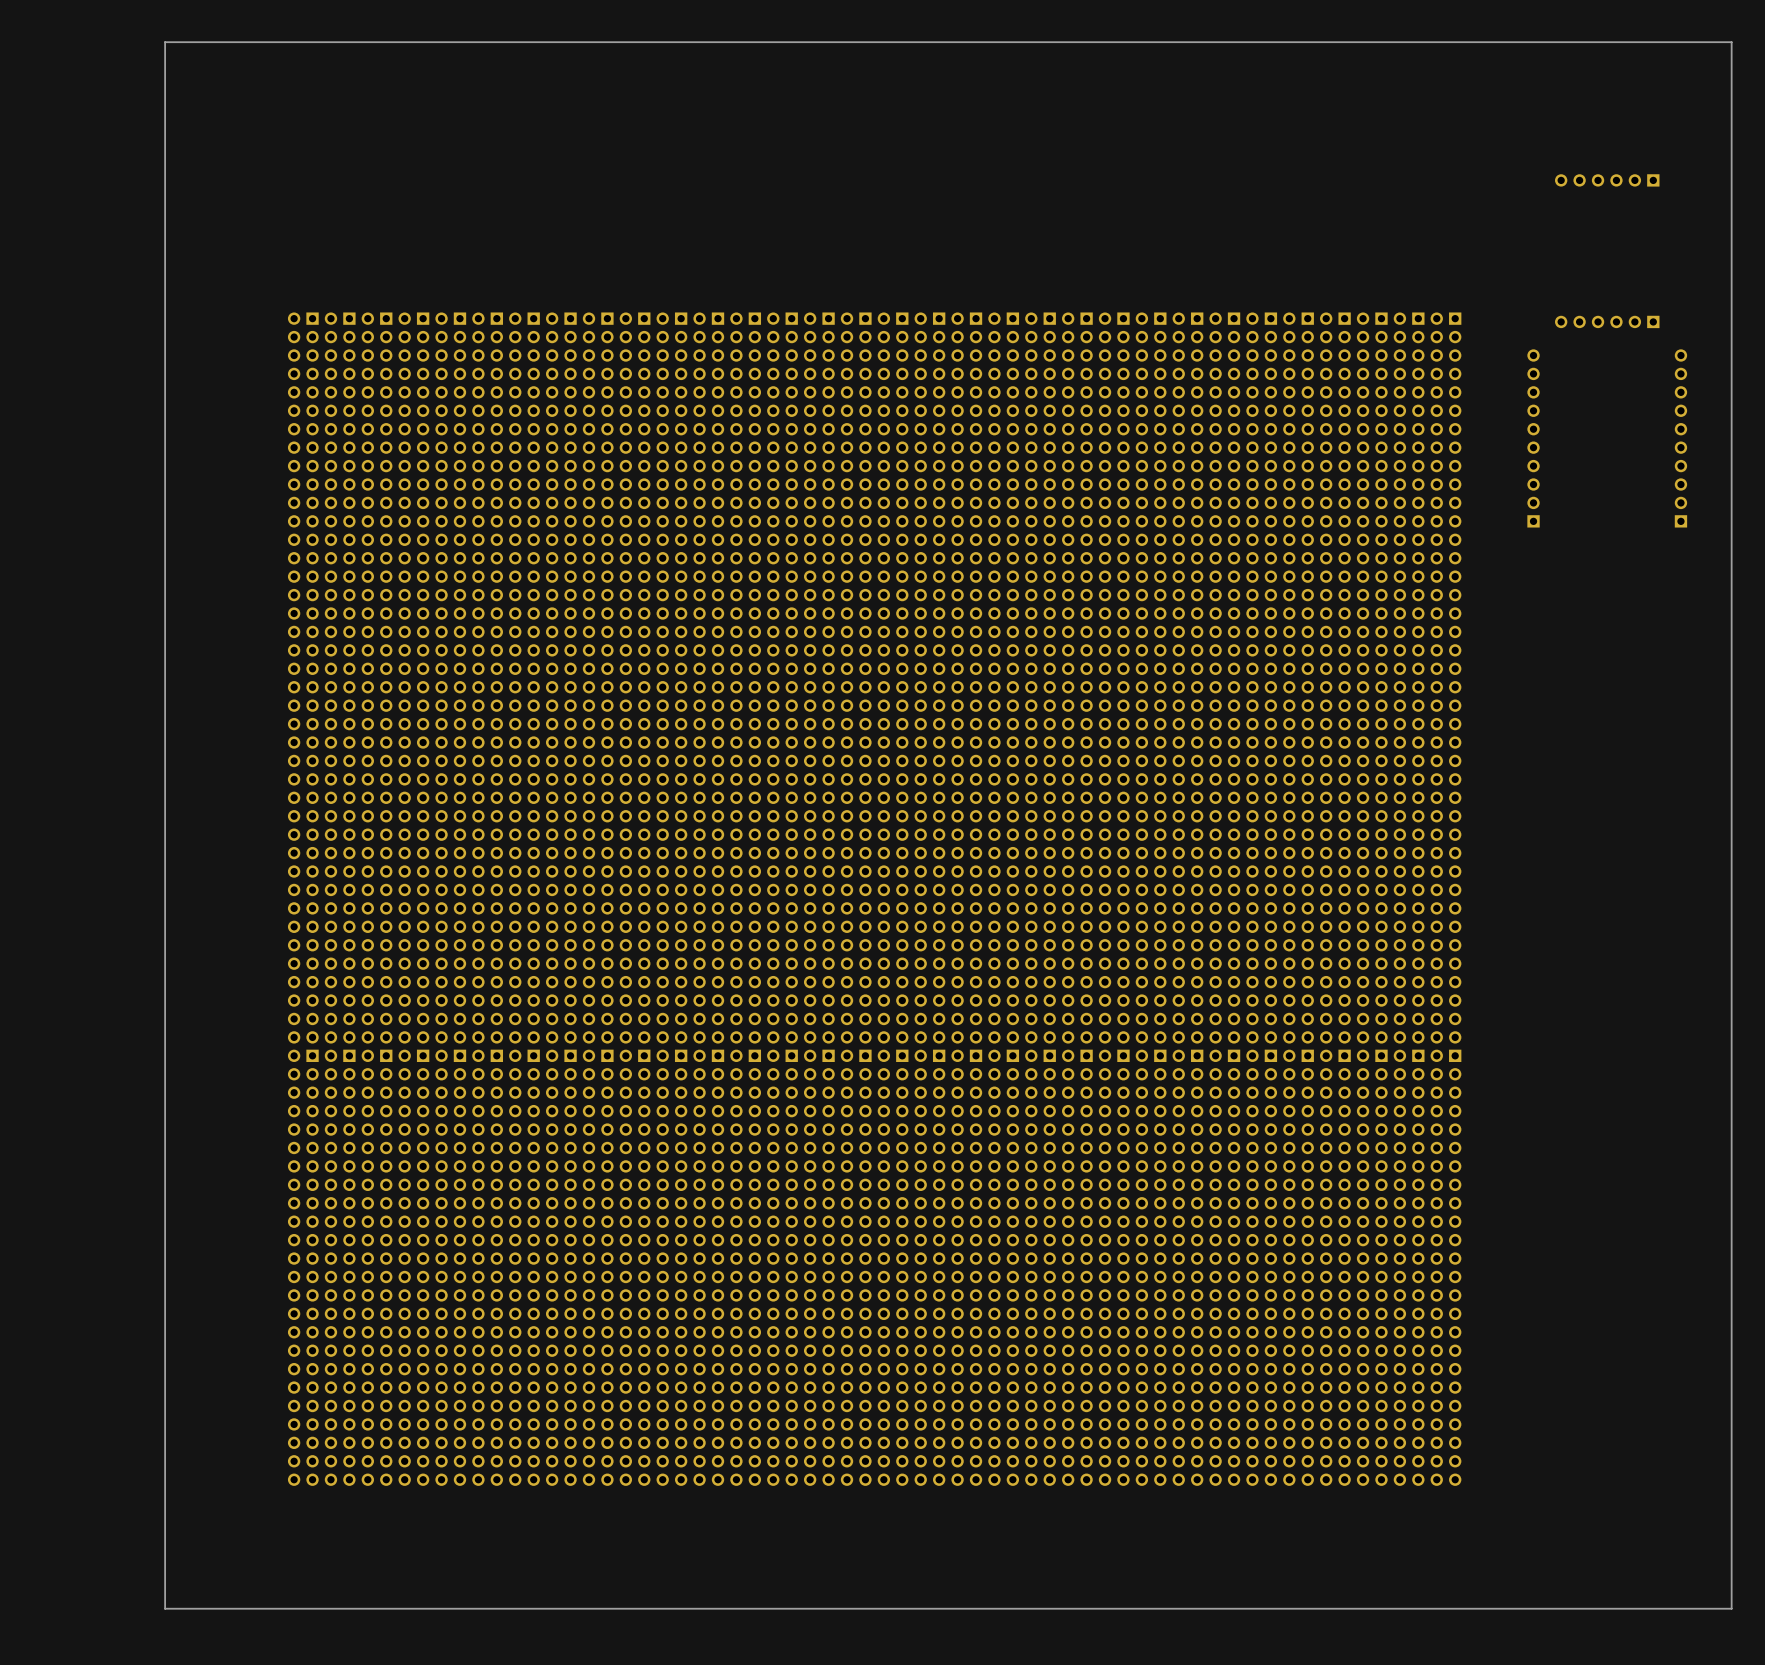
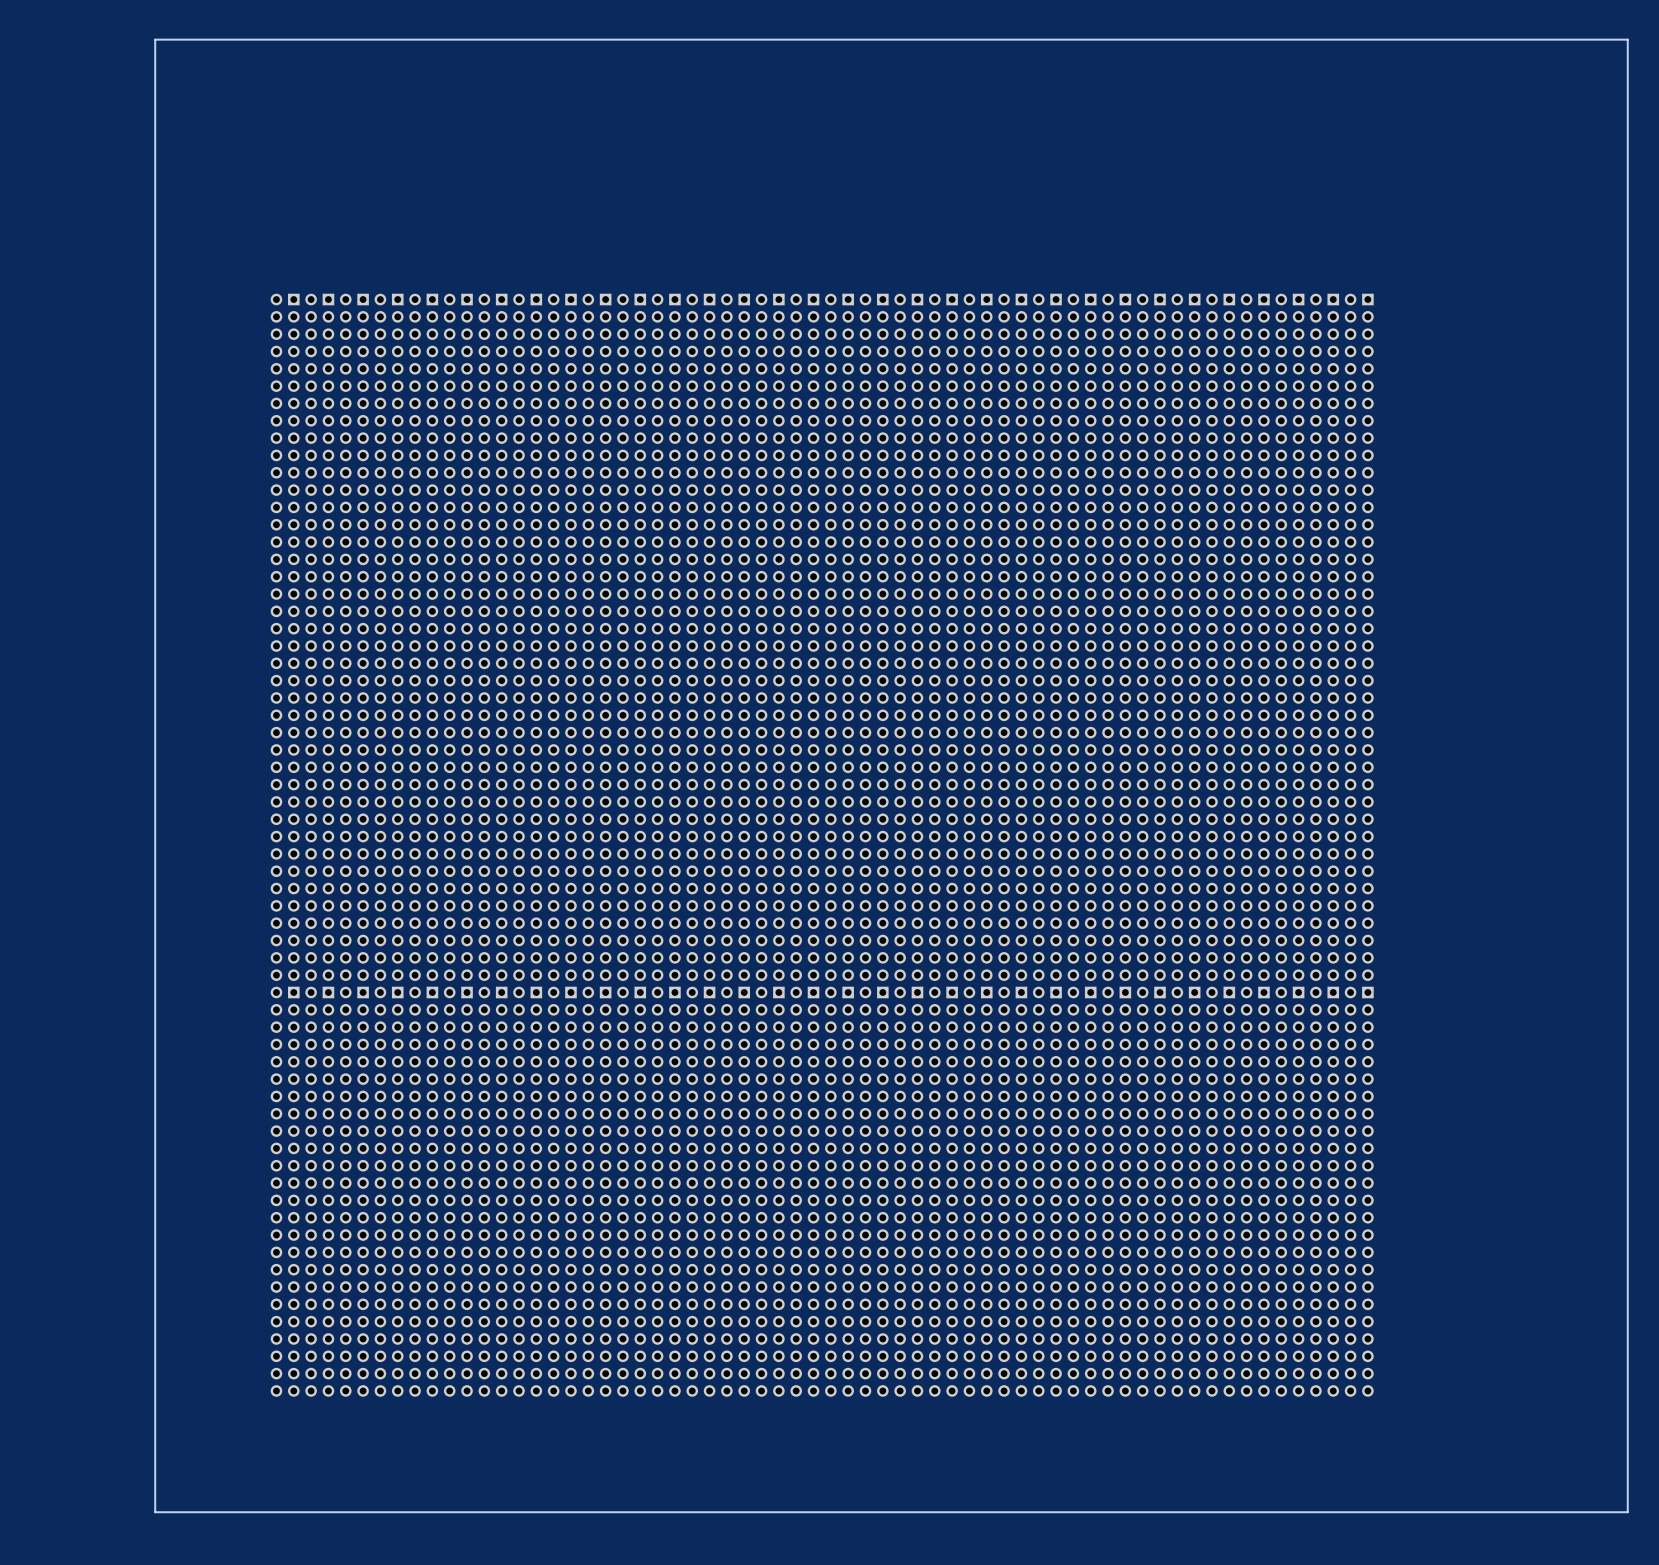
part: (1607, 180) -> none
part: (1607, 321) -> none
part: (1533, 438) -> none
part: (1680, 438) -> none

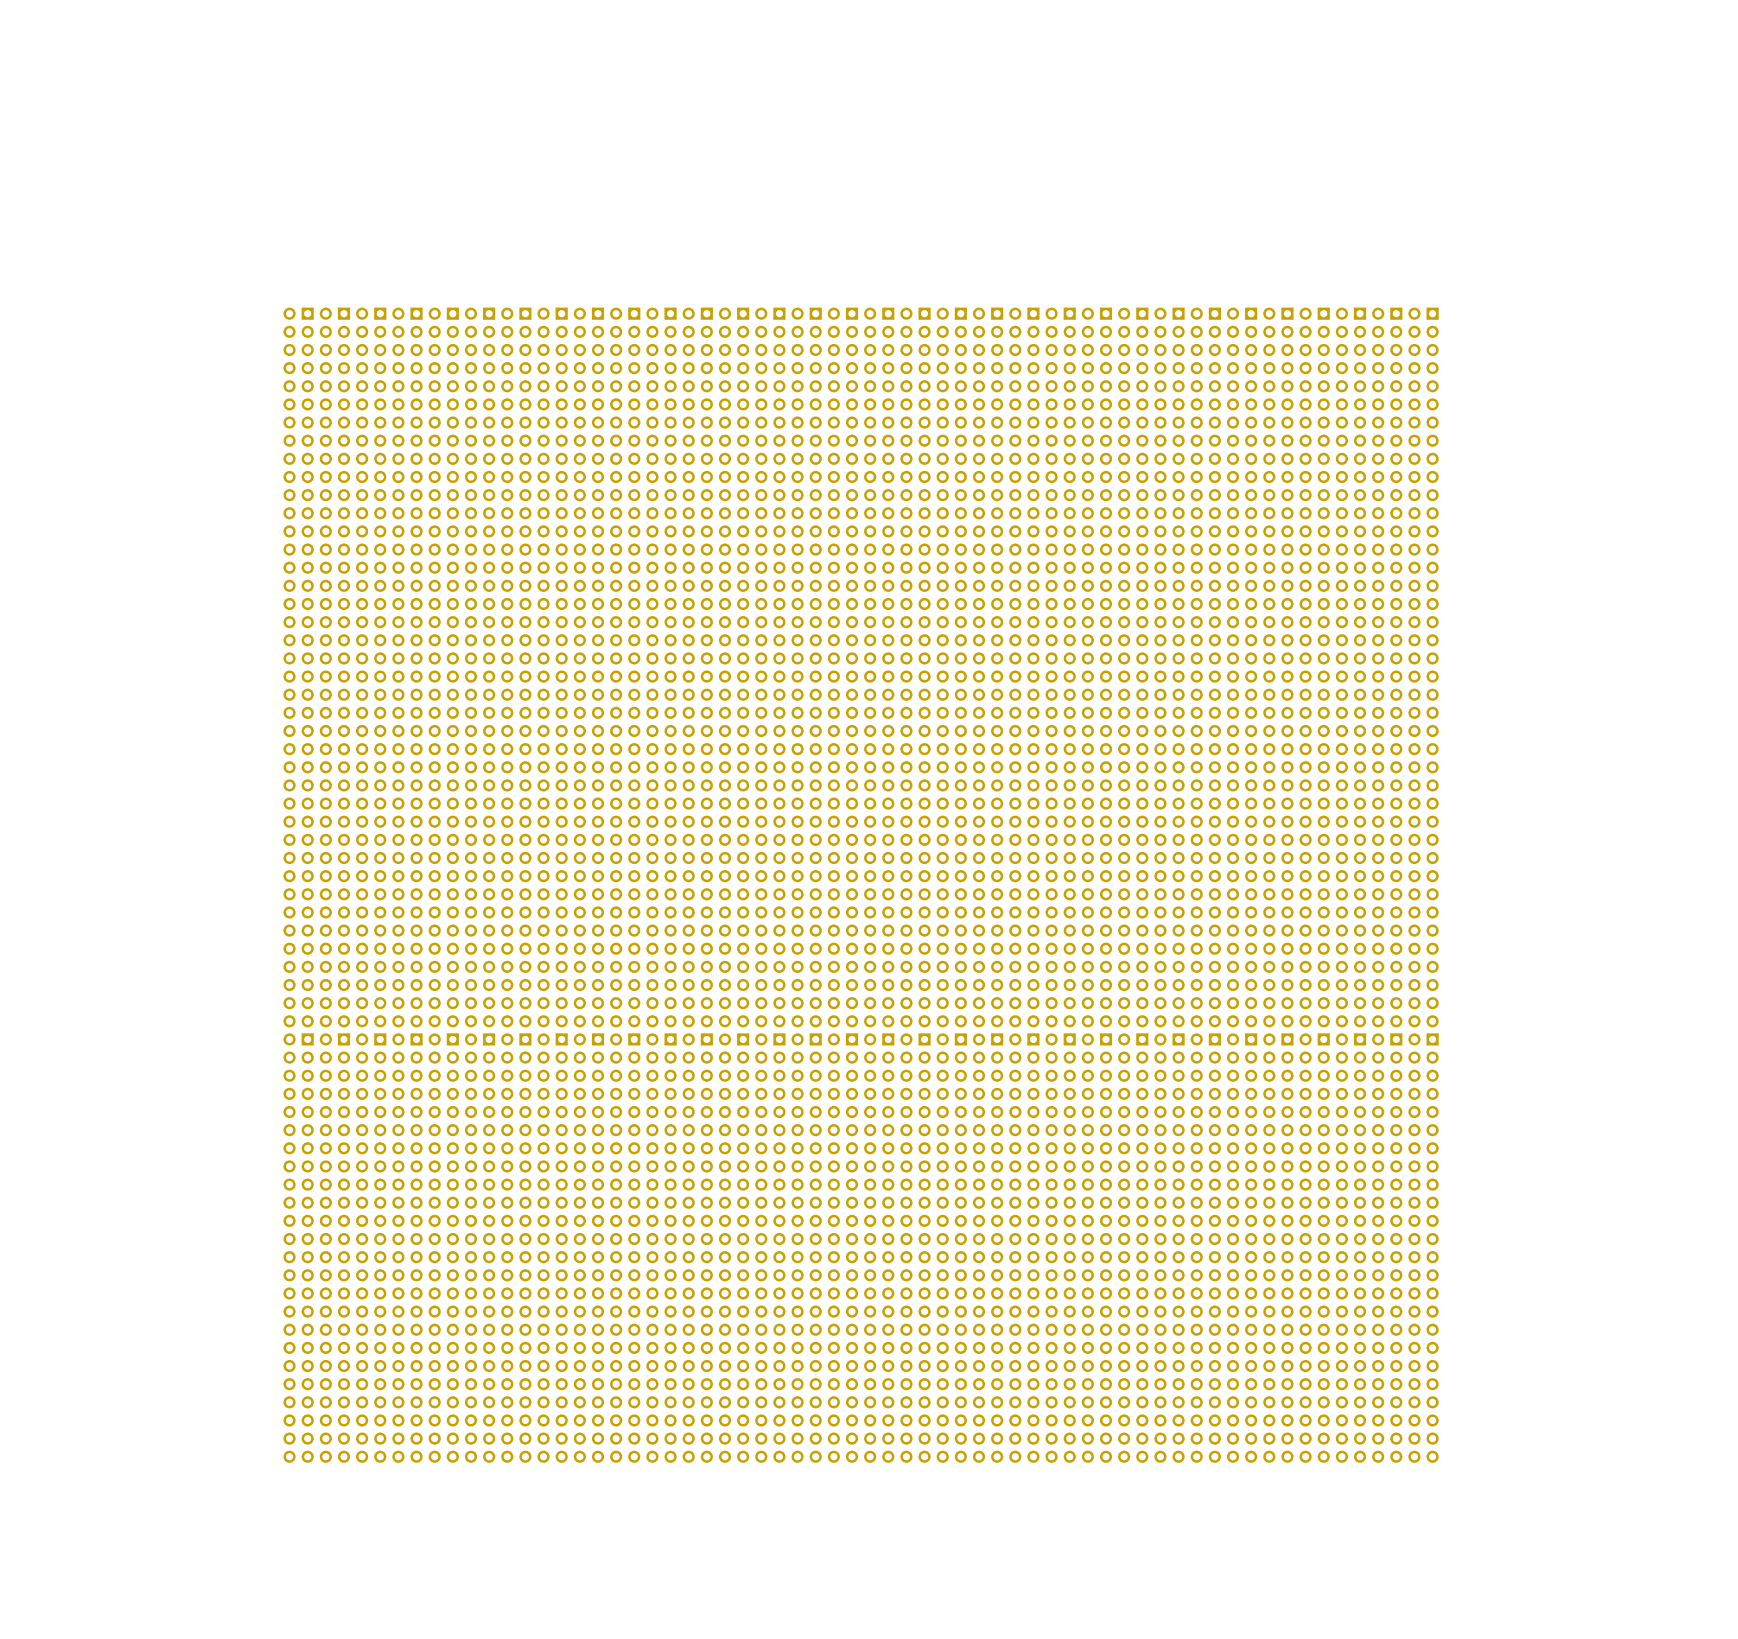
board edge: (1627, 39) (155, 39) (155, 1512) (1627, 1512) (1627, 39) -> none

